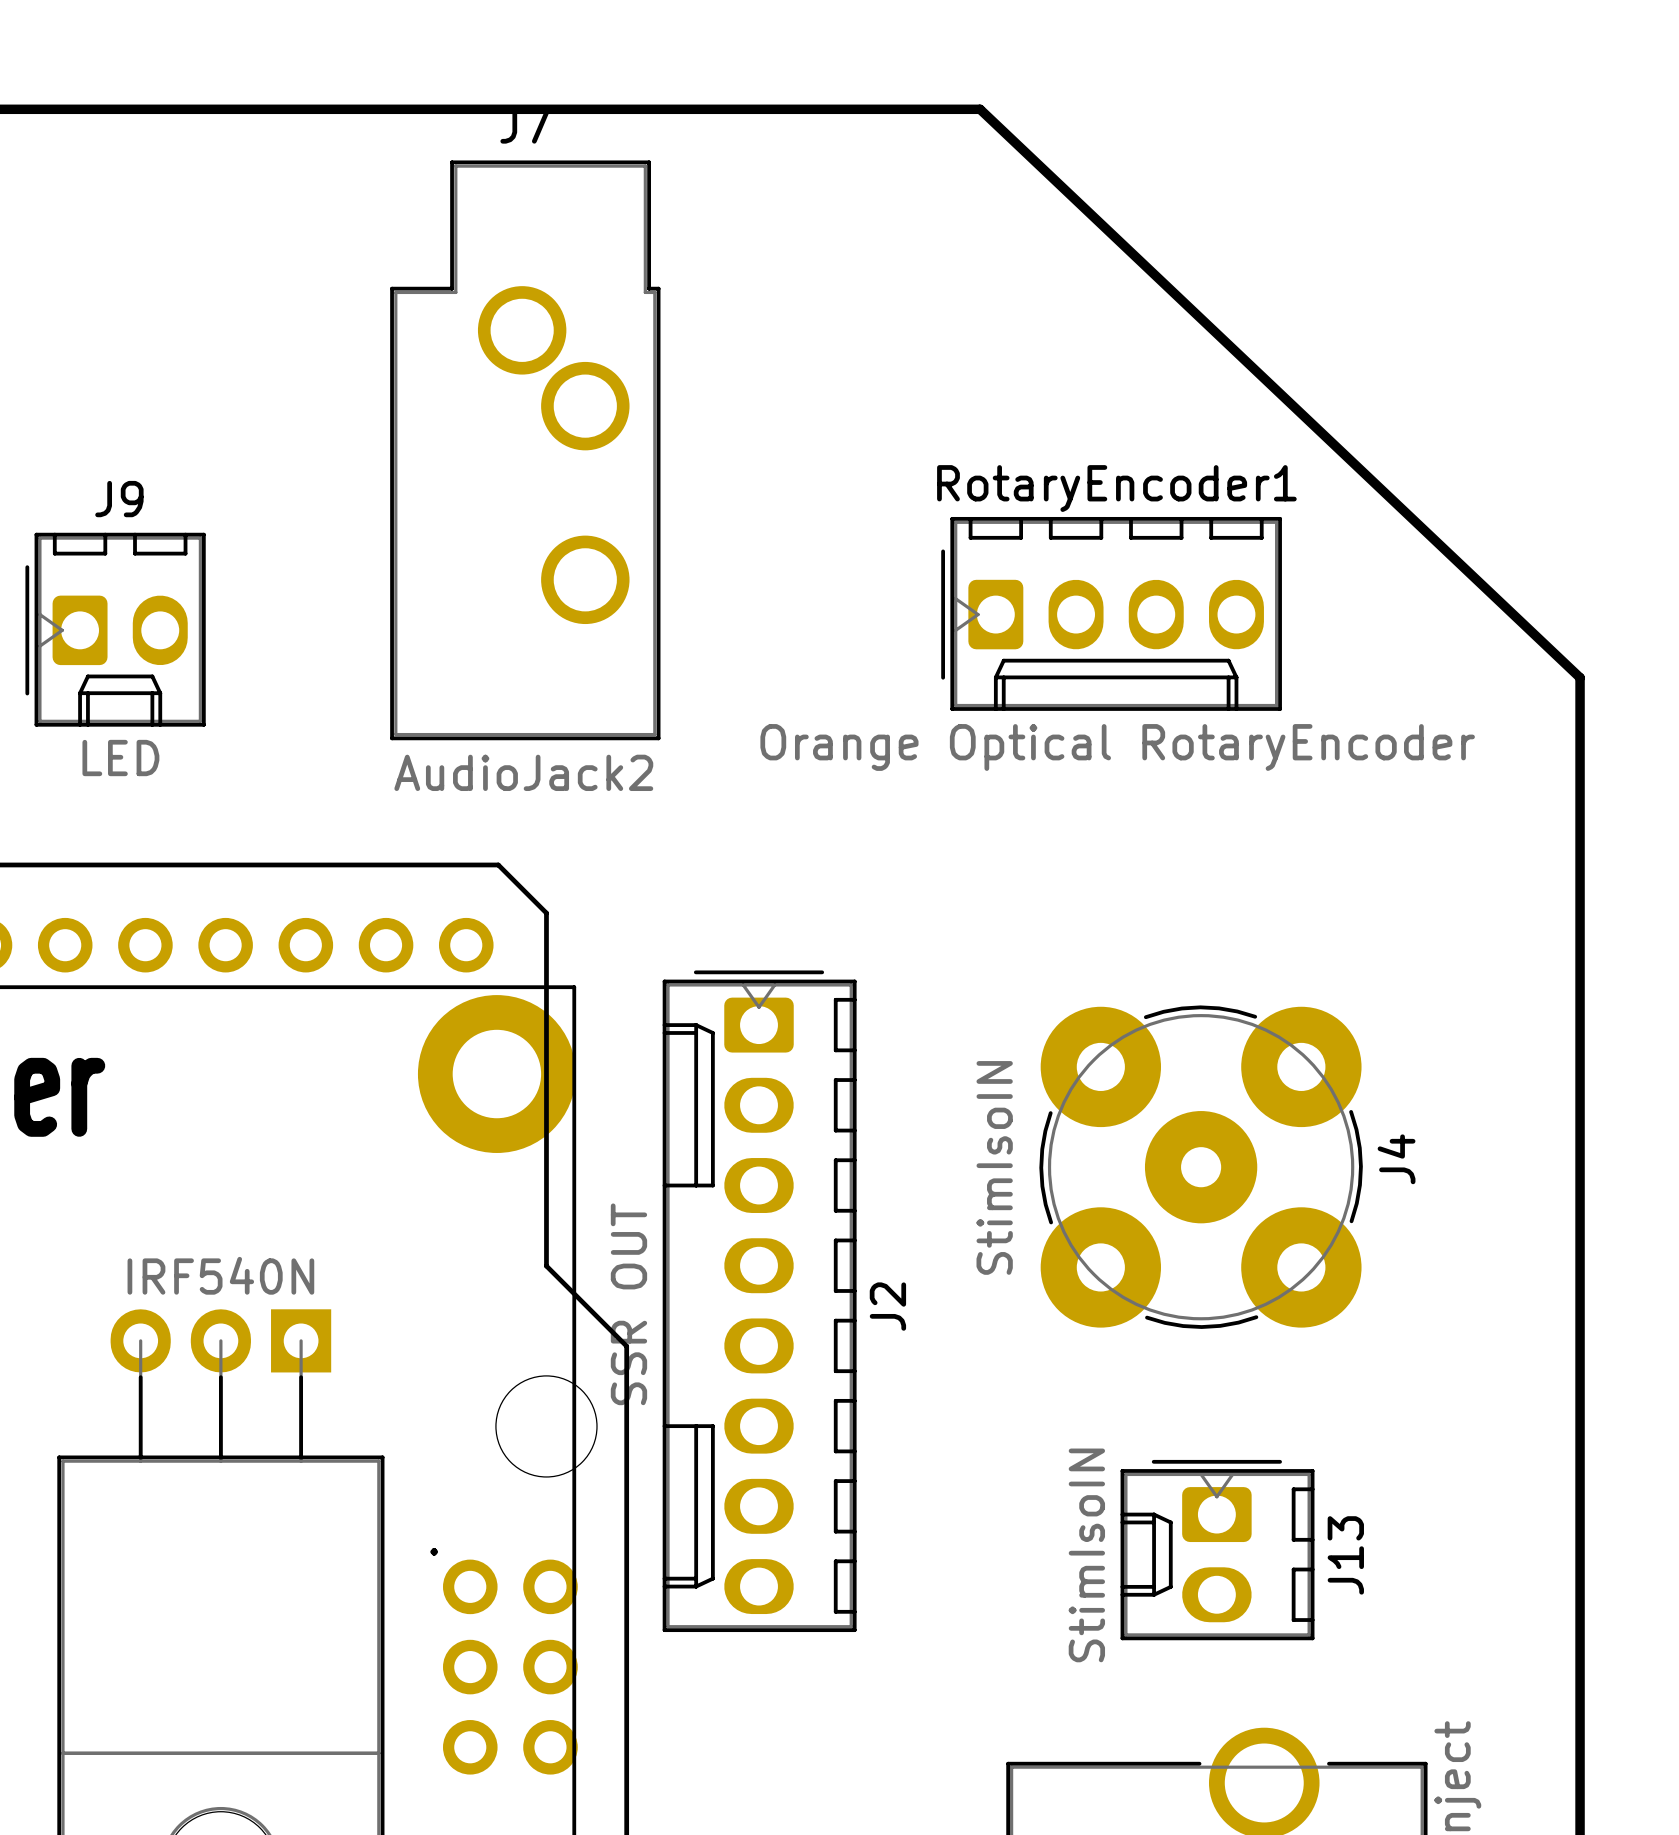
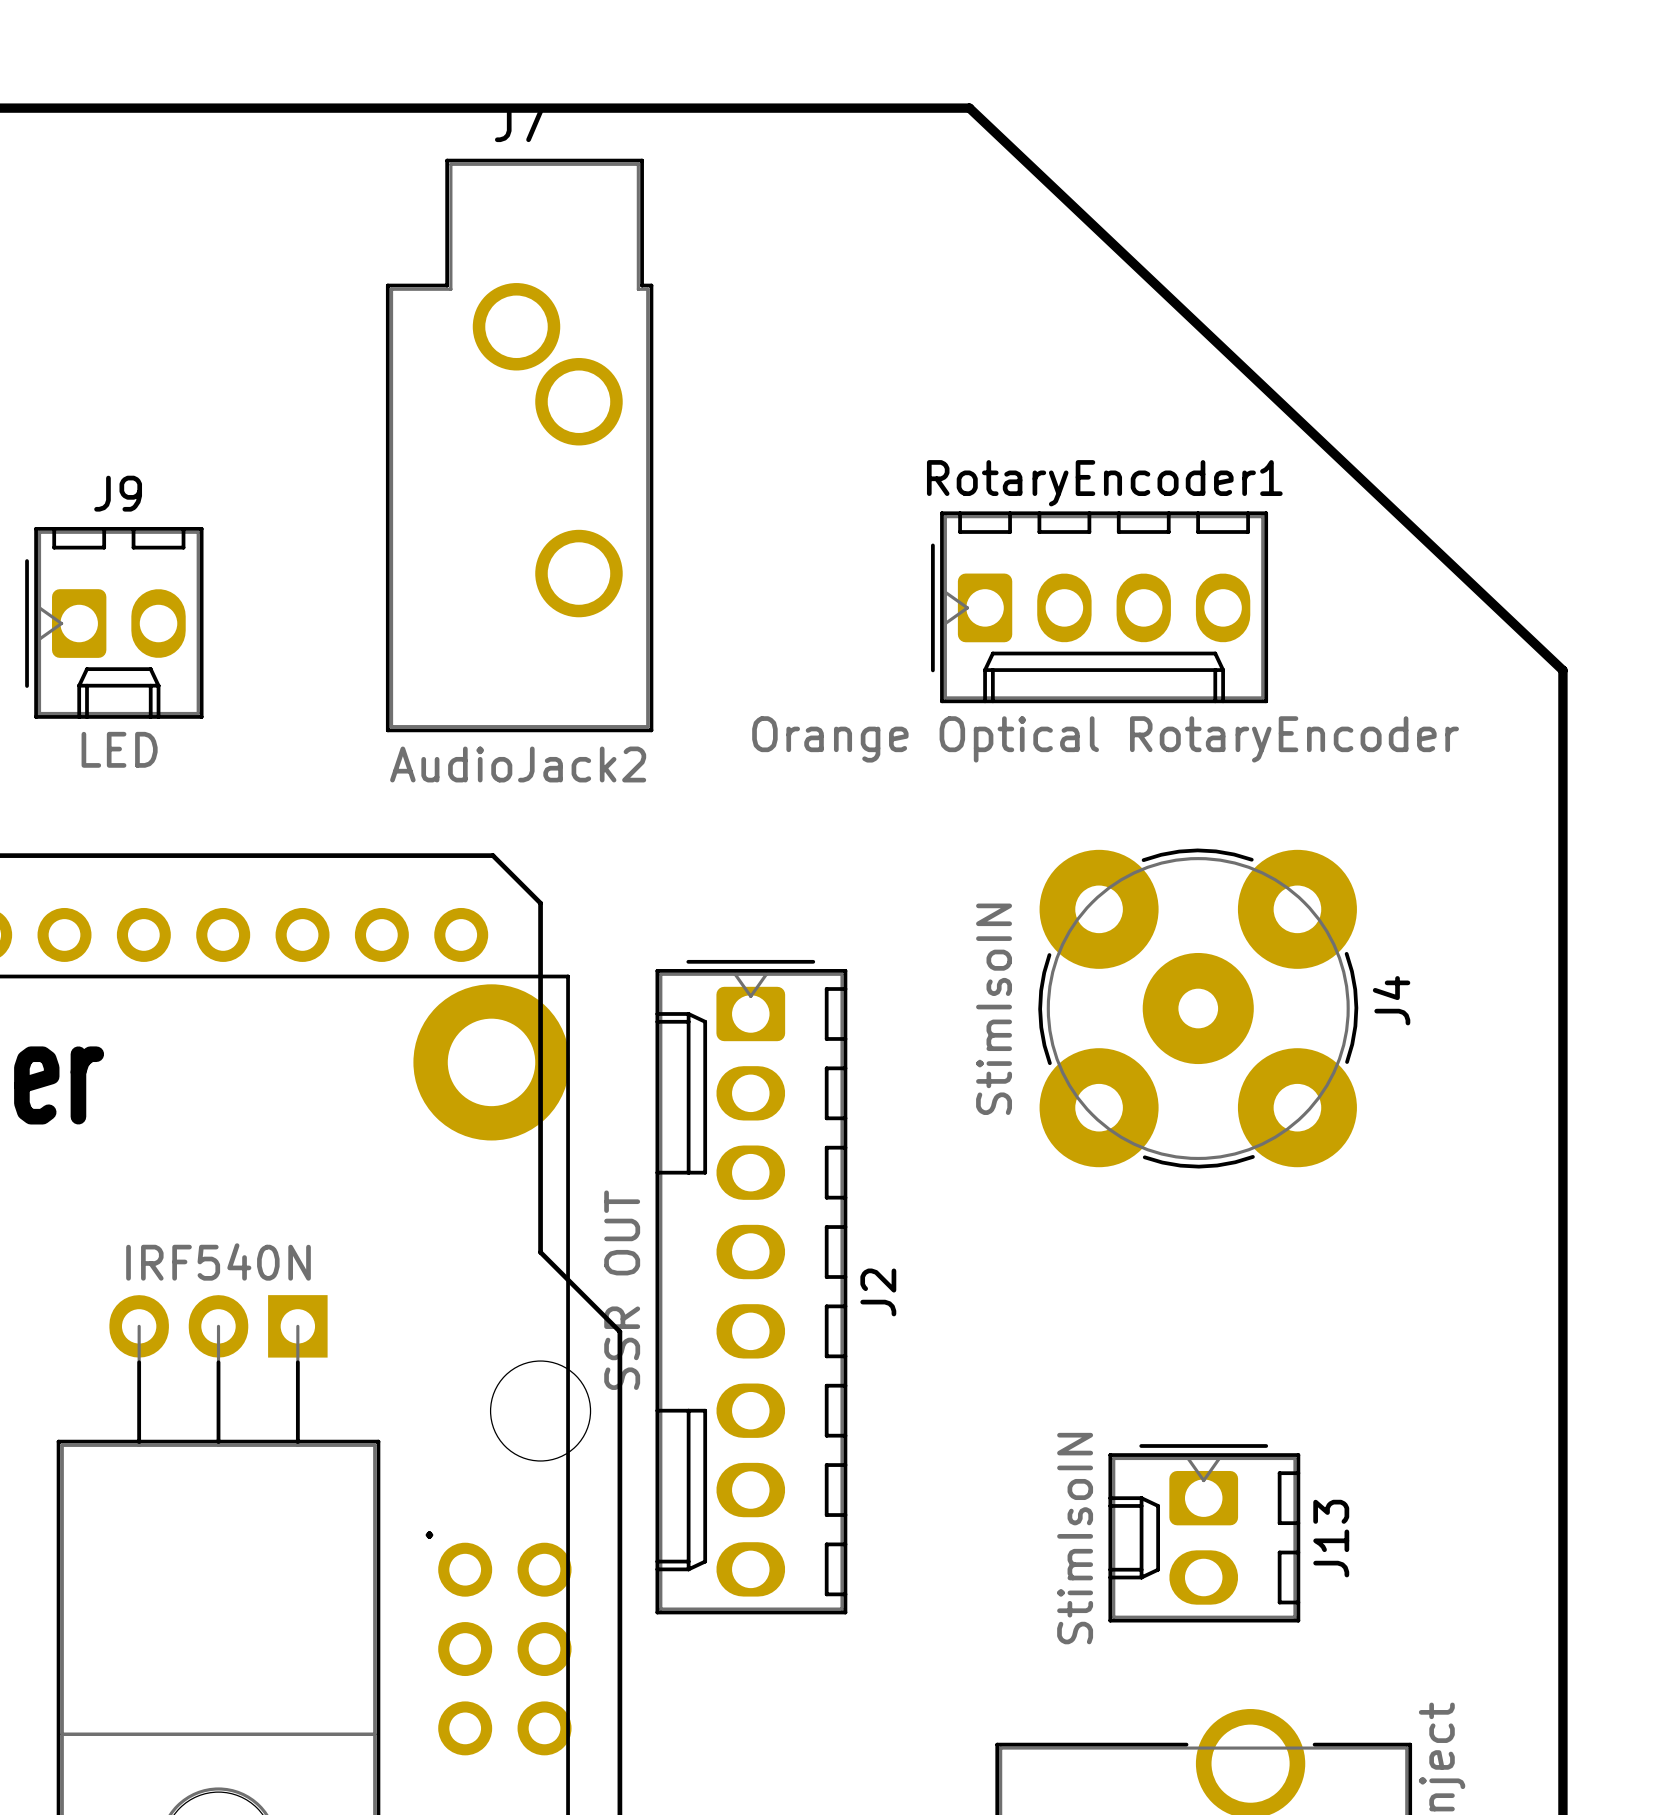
J4 position: (1201, 1167) -> (1198, 1008)

